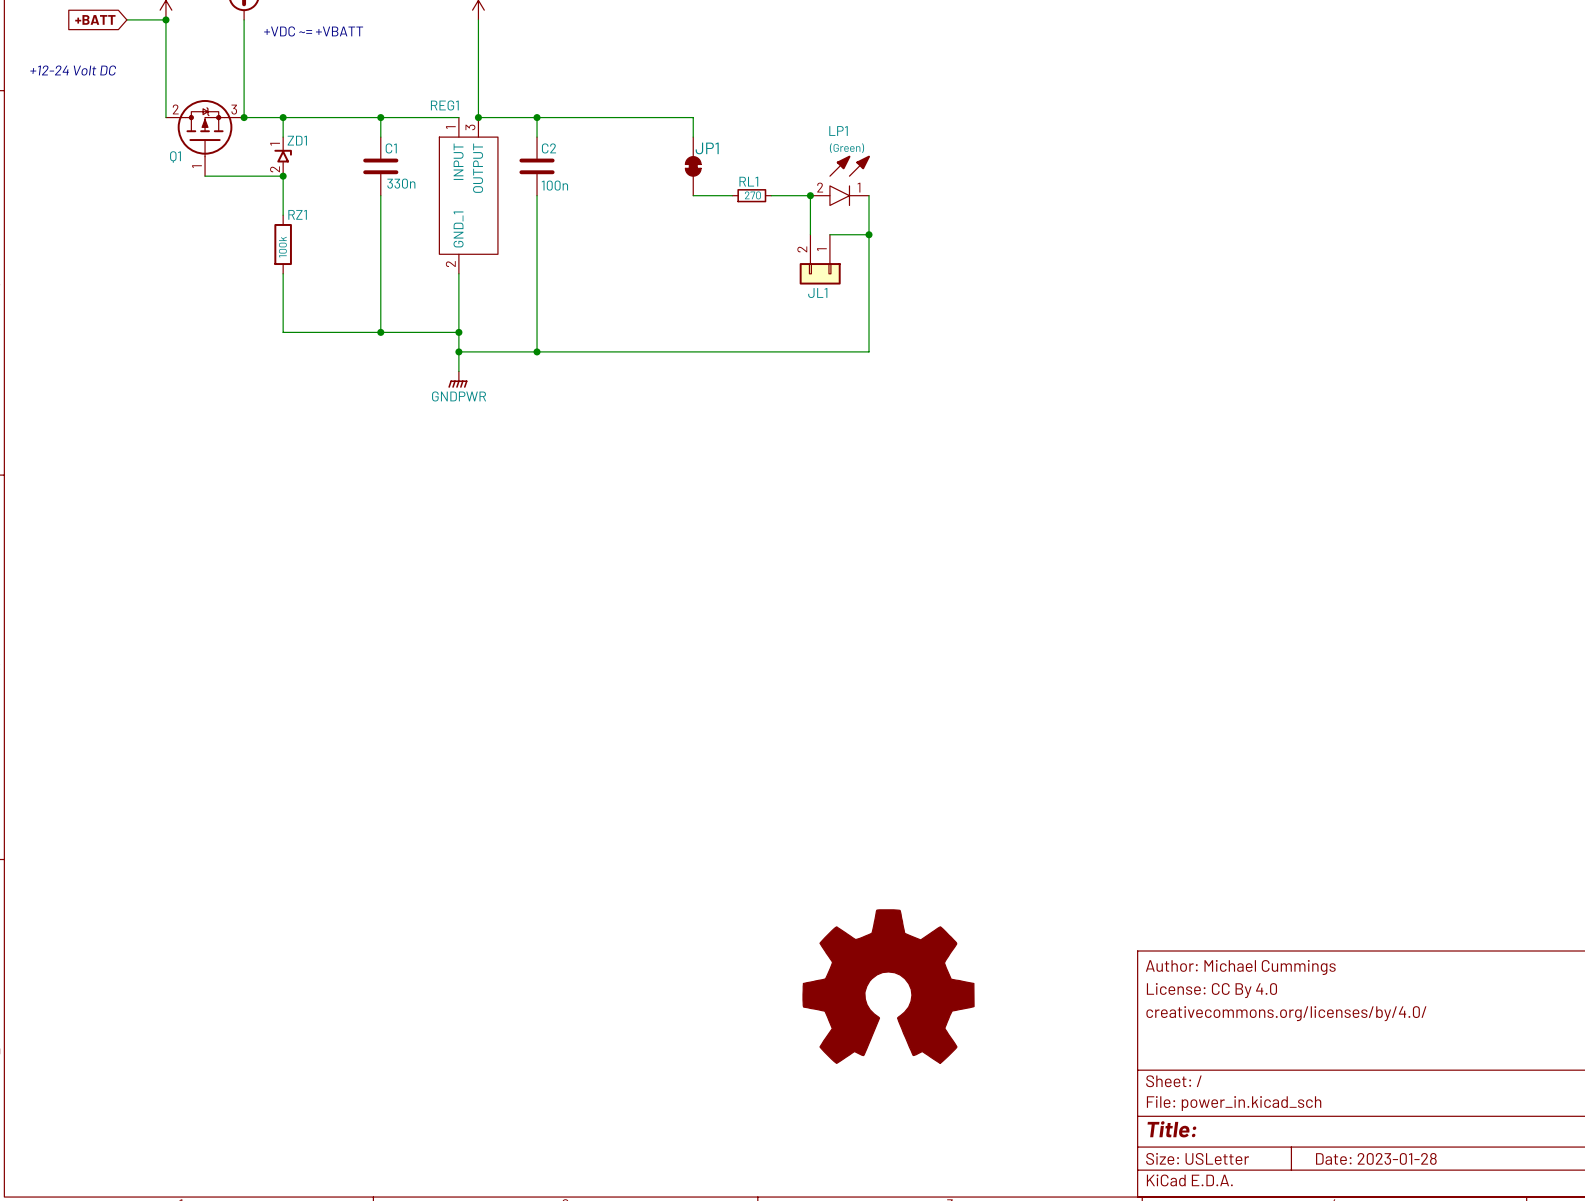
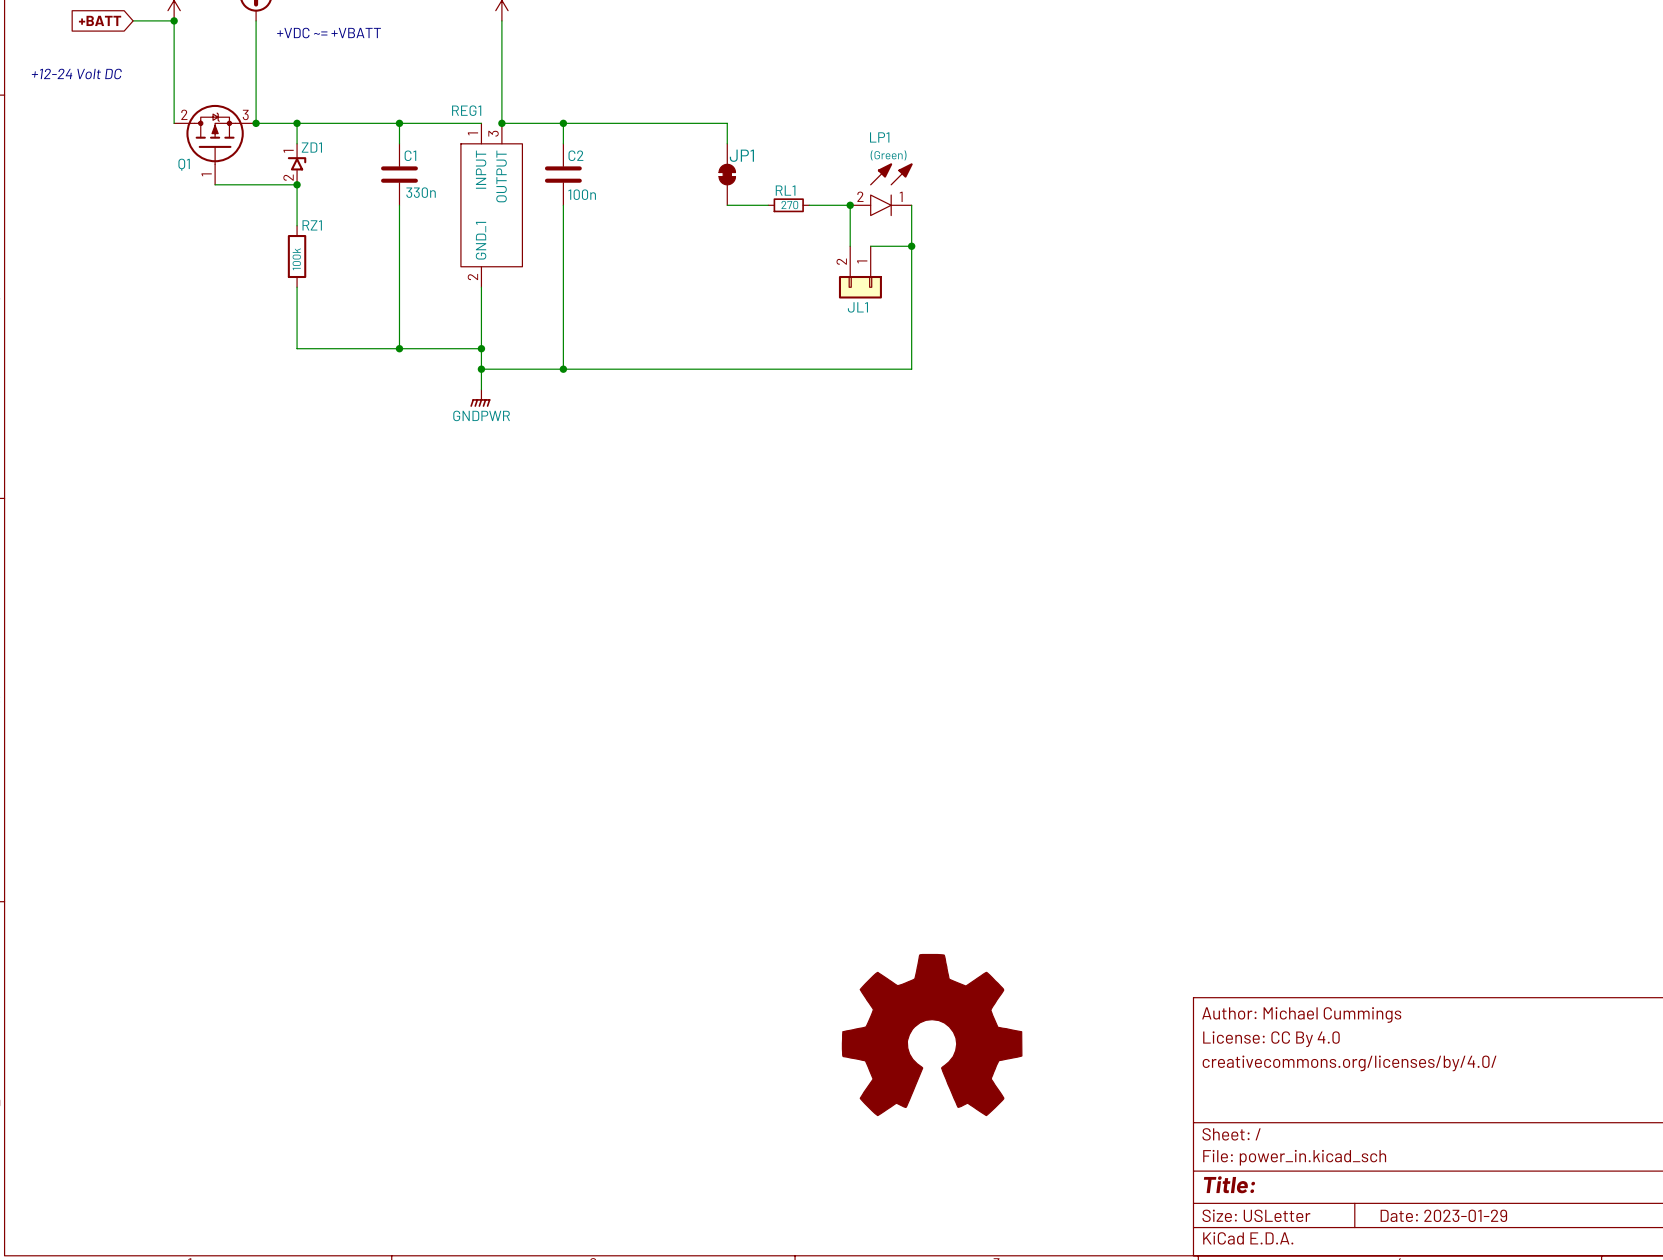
title block: Date: 2023-01-28 (1376, 1158) -> Date: 2023-01-29 (1443, 1215)

